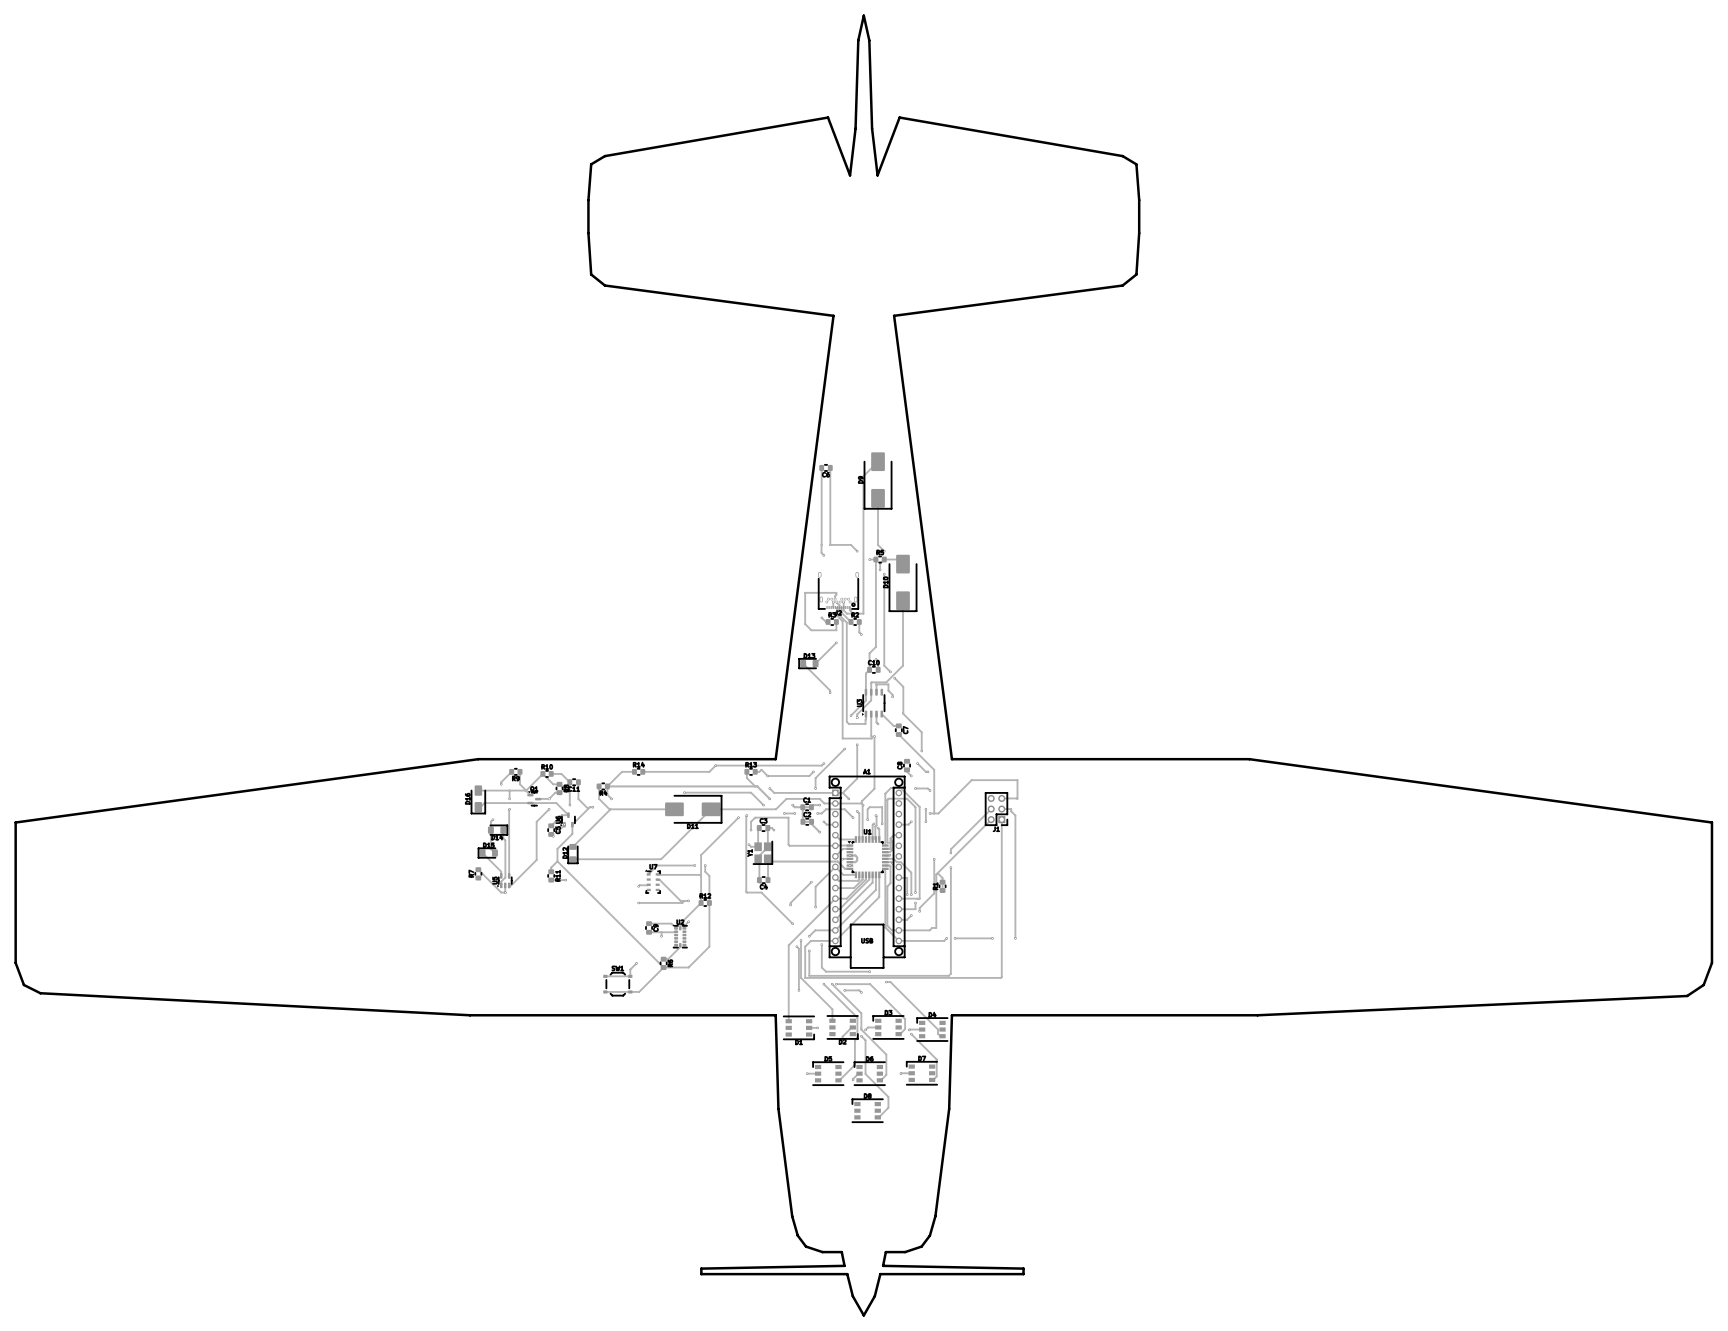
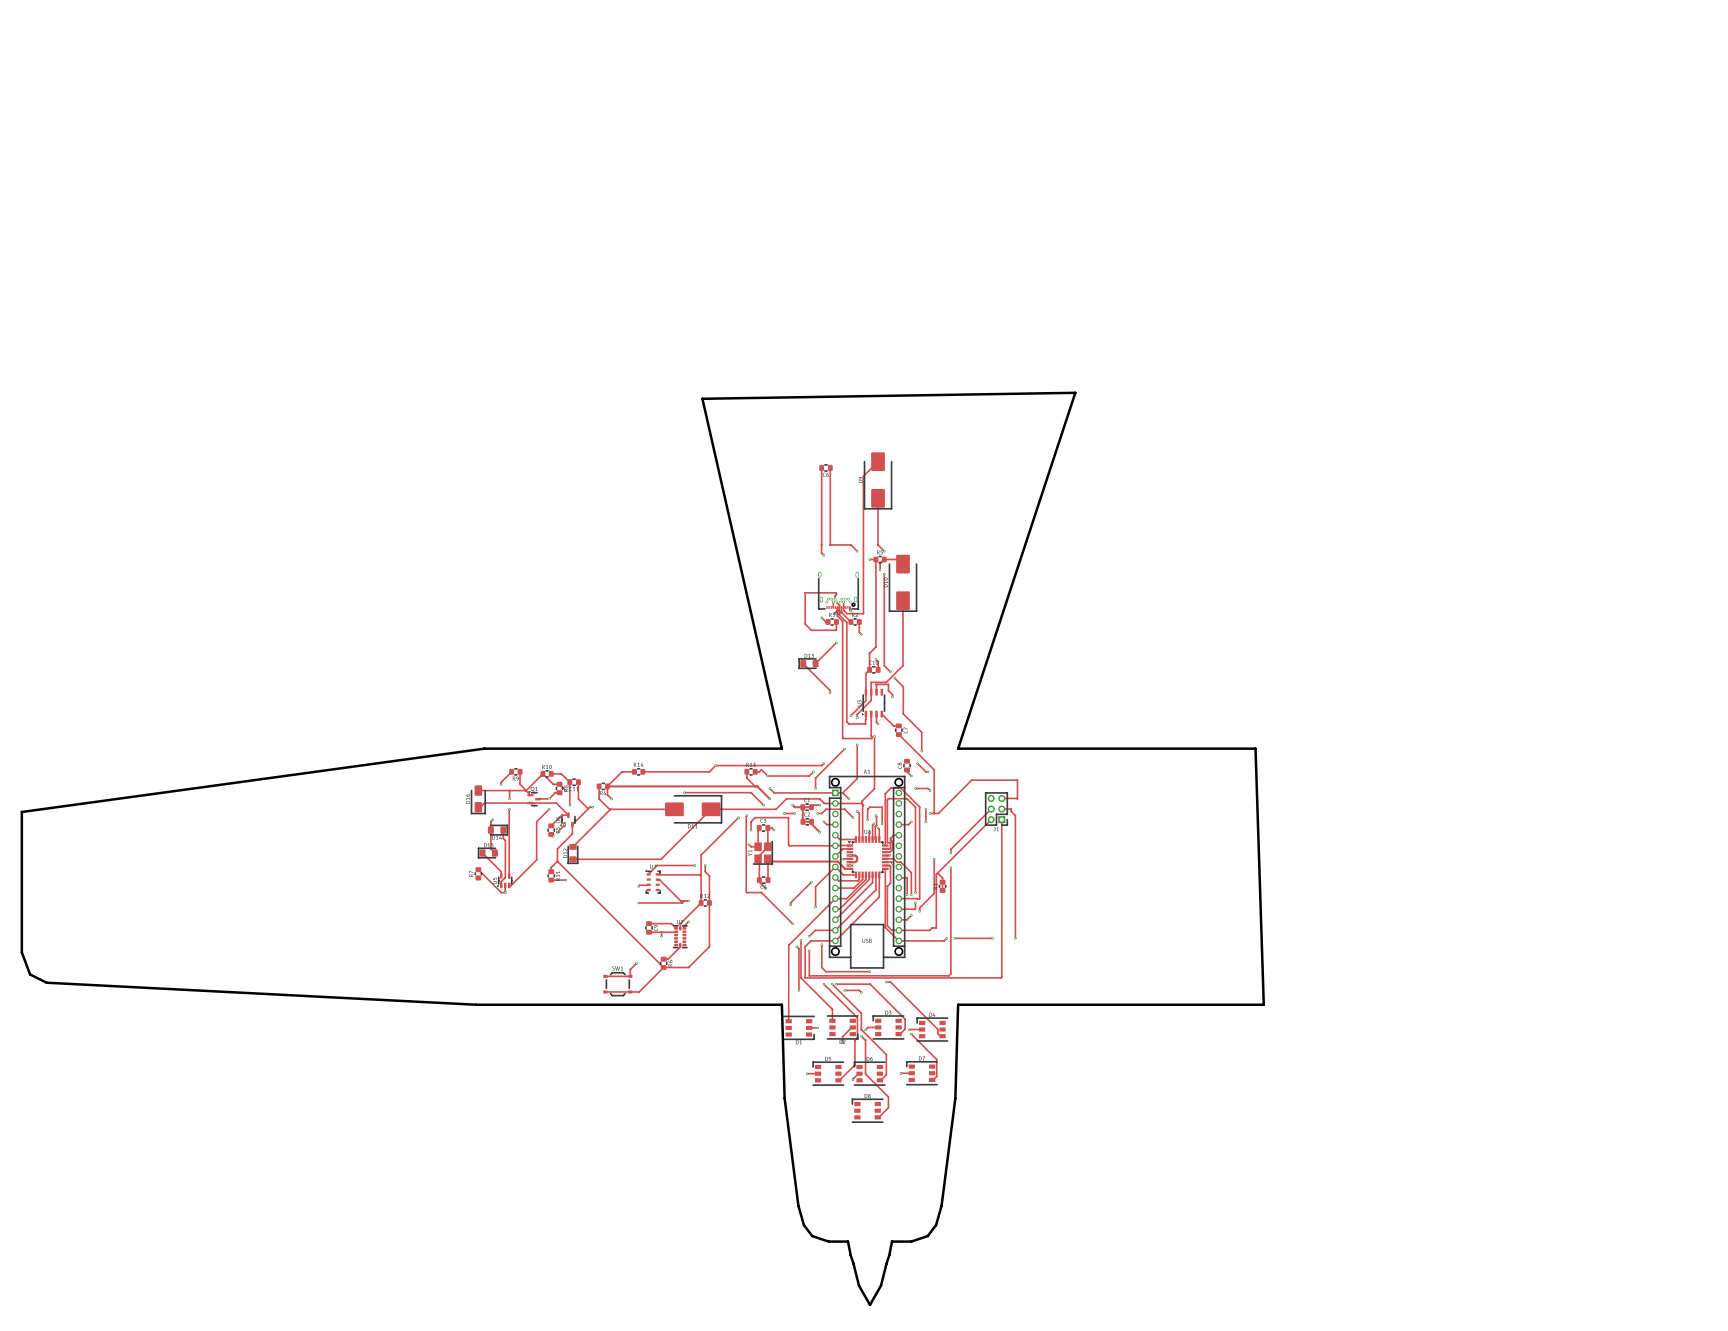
board edge: (863, 15) (858, 40) (855, 128) (850, 175) (828, 117) (604, 156) (591, 164) (588, 200) (591, 274) (604, 285) (833, 315) (775, 759) (478, 759) (15, 822) (15, 962) (23, 984) (40, 993) (470, 1015) (775, 1015) (778, 1108) (792, 1216) (797, 1235) (805, 1246) (822, 1252) (841, 1252) (844, 1265) (701, 1268) (701, 1274) (847, 1274) (852, 1296) (863, 1315) (874, 1296) (880, 1274) (1023, 1274) (1023, 1268) (883, 1265) (885, 1252) (905, 1252) (921, 1246) (929, 1235) (935, 1216) (949, 1108) (951, 1015) (1257, 1015) (1687, 995) (1703, 984) (1711, 962) (1711, 822) (1249, 759) (951, 759) (894, 315) (1122, 285) (1136, 274) (1139, 233) (1136, 164) (1122, 156) (899, 117) (877, 175) (872, 128) (869, 40) (863, 15) -> (1075, 392) (702, 398) (781, 748) (484, 748) (21, 811) (21, 952) (30, 974) (46, 982) (476, 1004) (781, 1004) (784, 1098) (798, 1205) (803, 1225) (812, 1236) (828, 1241) (847, 1241) (858, 1285) (869, 1304) (881, 1285) (892, 1241) (911, 1241) (927, 1236) (936, 1225) (941, 1205) (955, 1098) (958, 1004) (1263, 1004) (1255, 748) (958, 748) (1075, 392)

